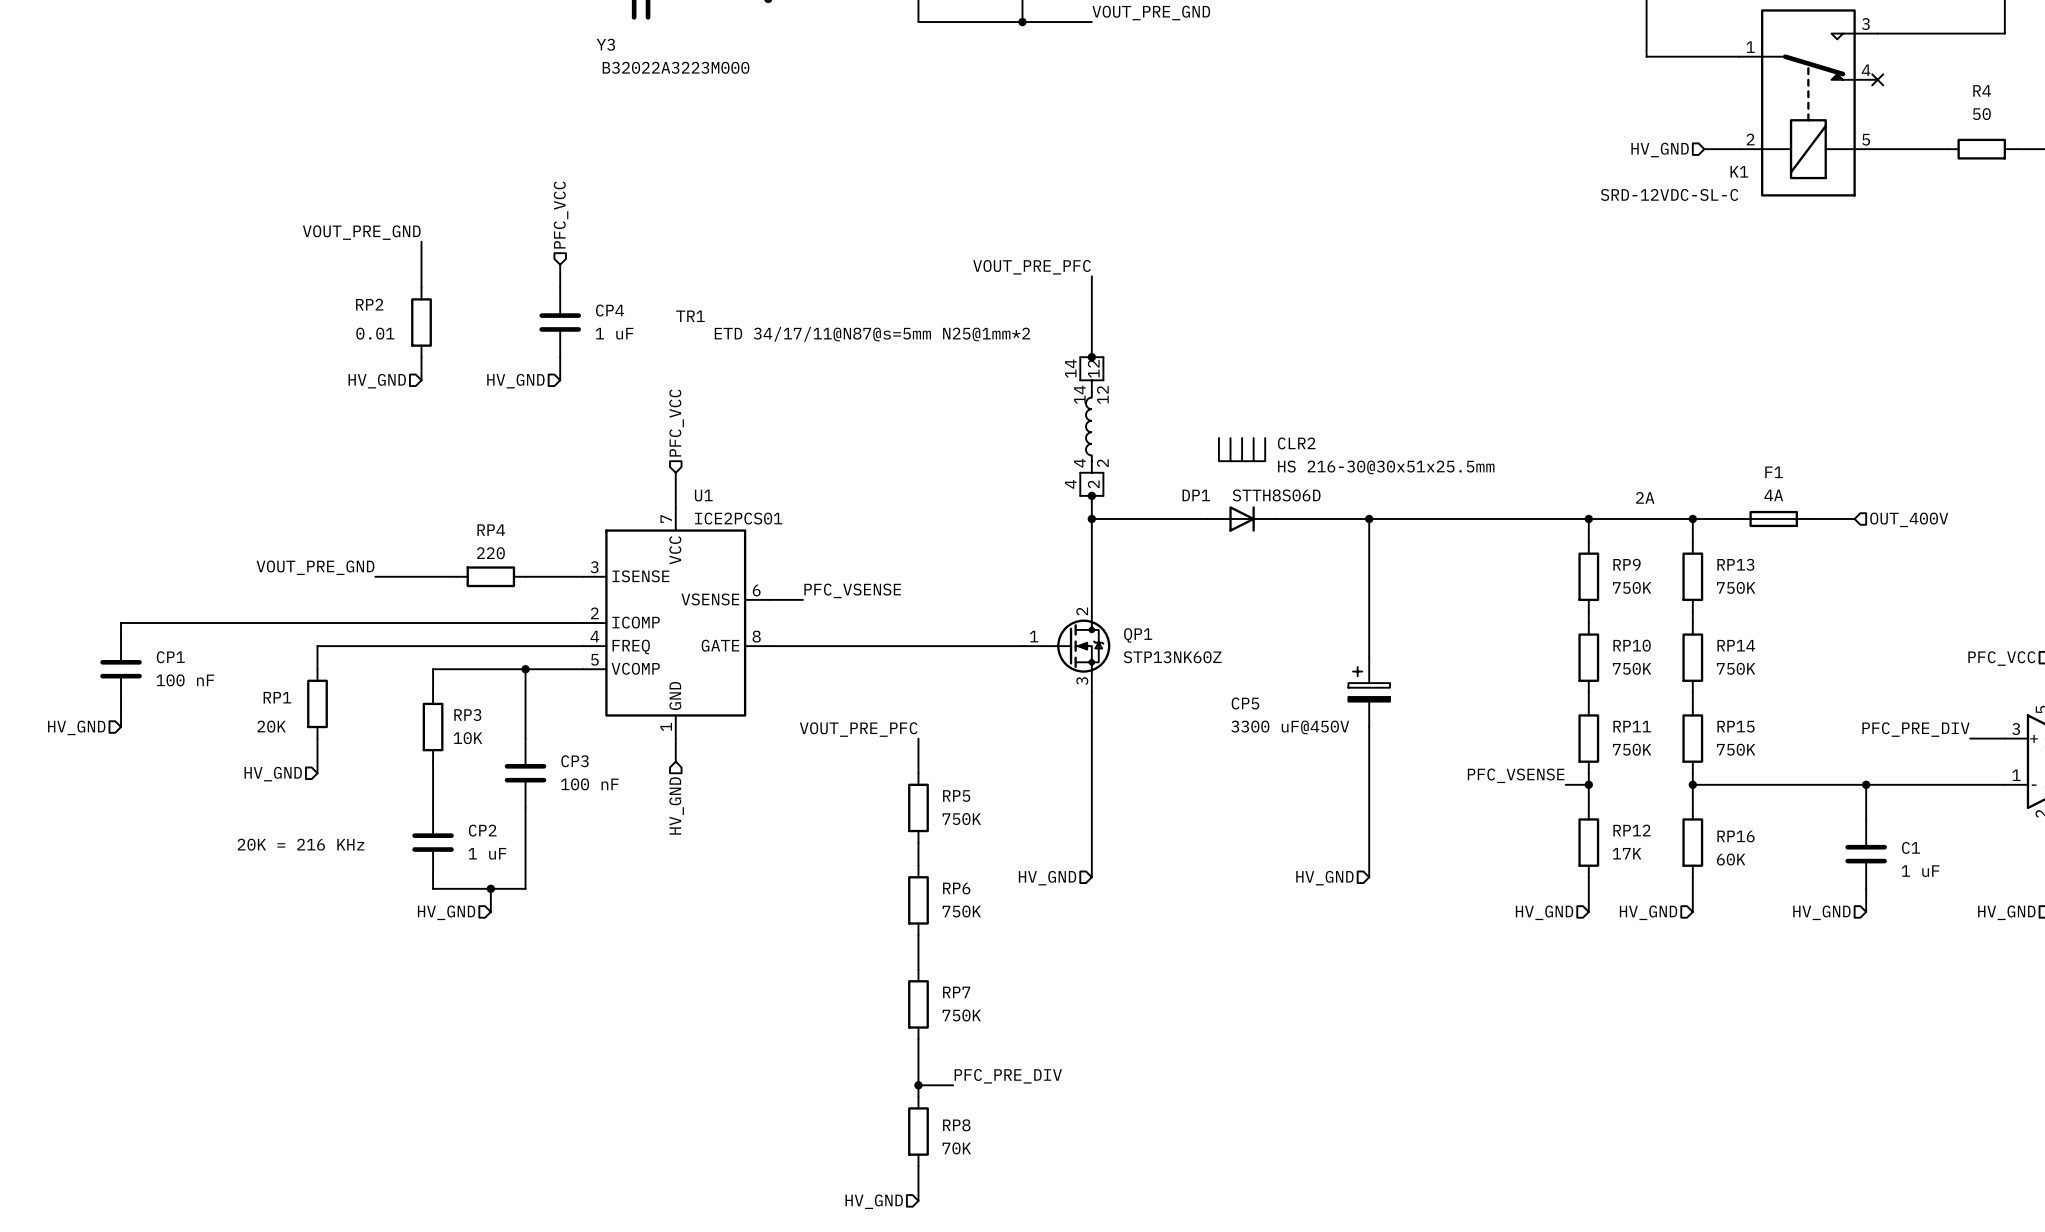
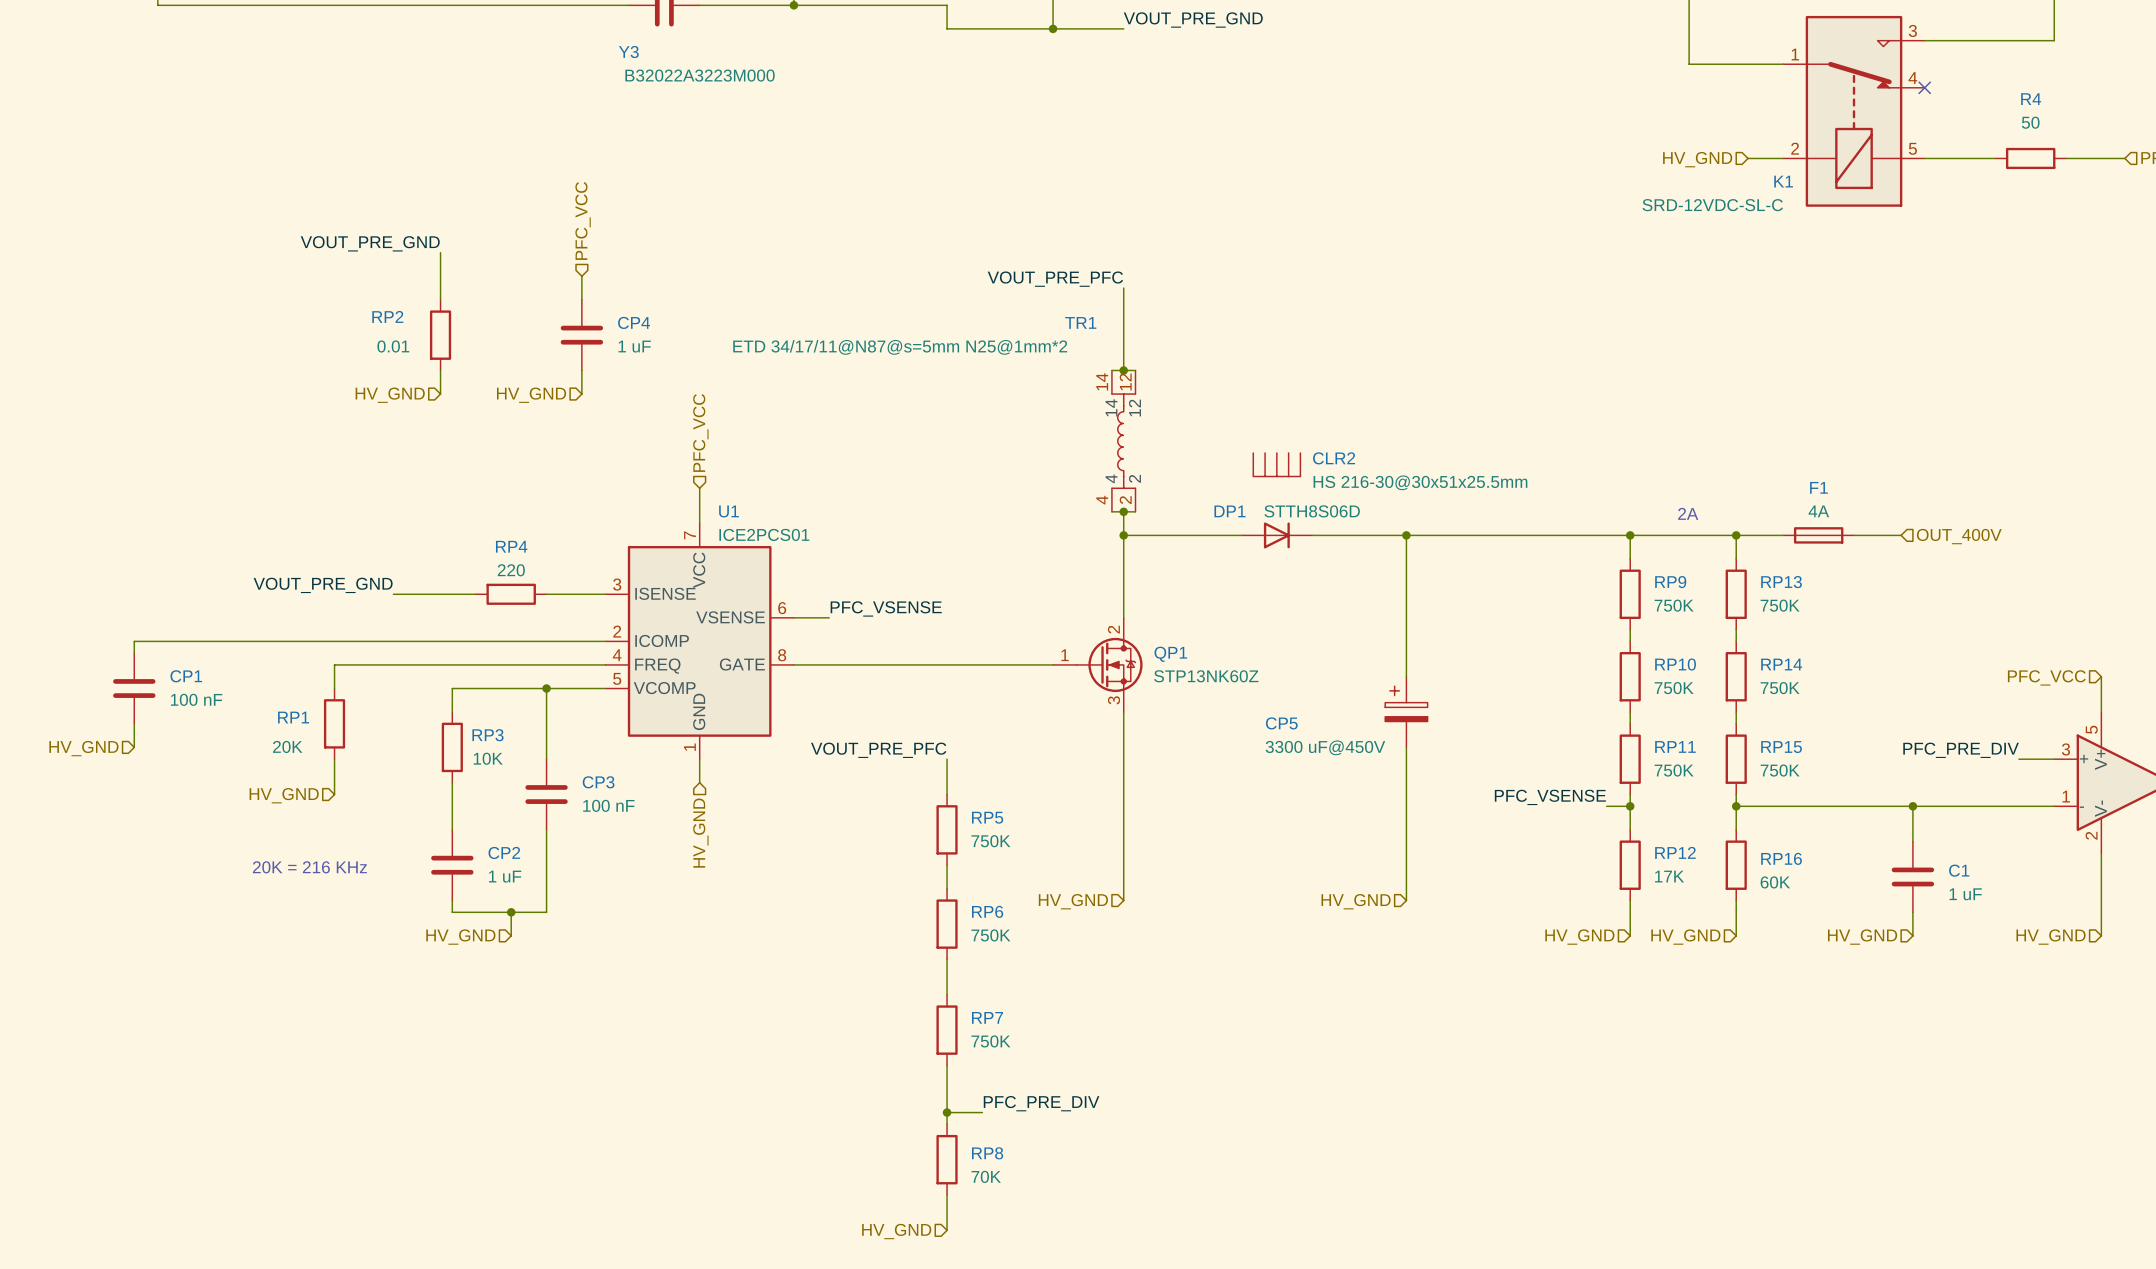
TR1 name position: TR1 (690, 316) -> TR1 (1080, 322)

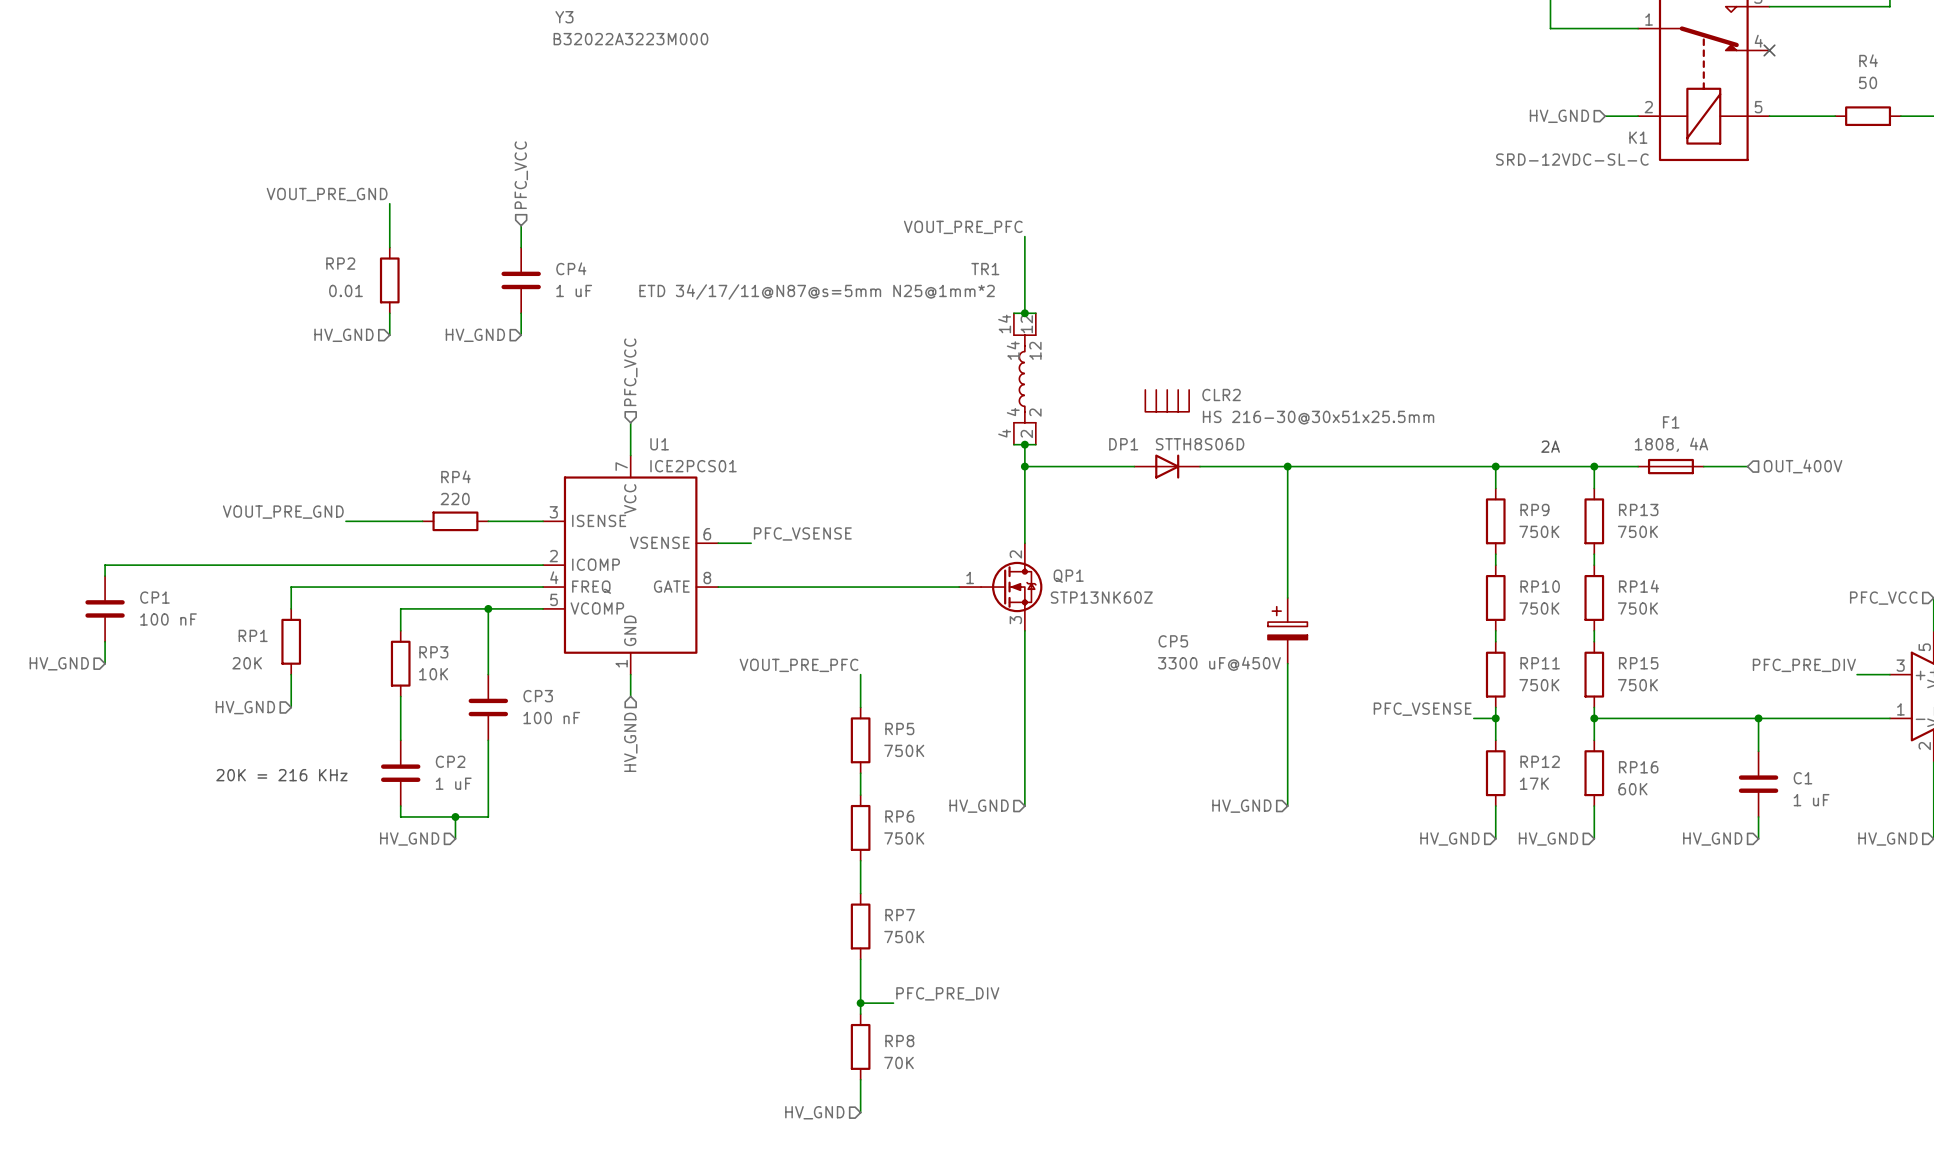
F1 value: 4A (1818, 511) -> 1808, 4A (1671, 444)

